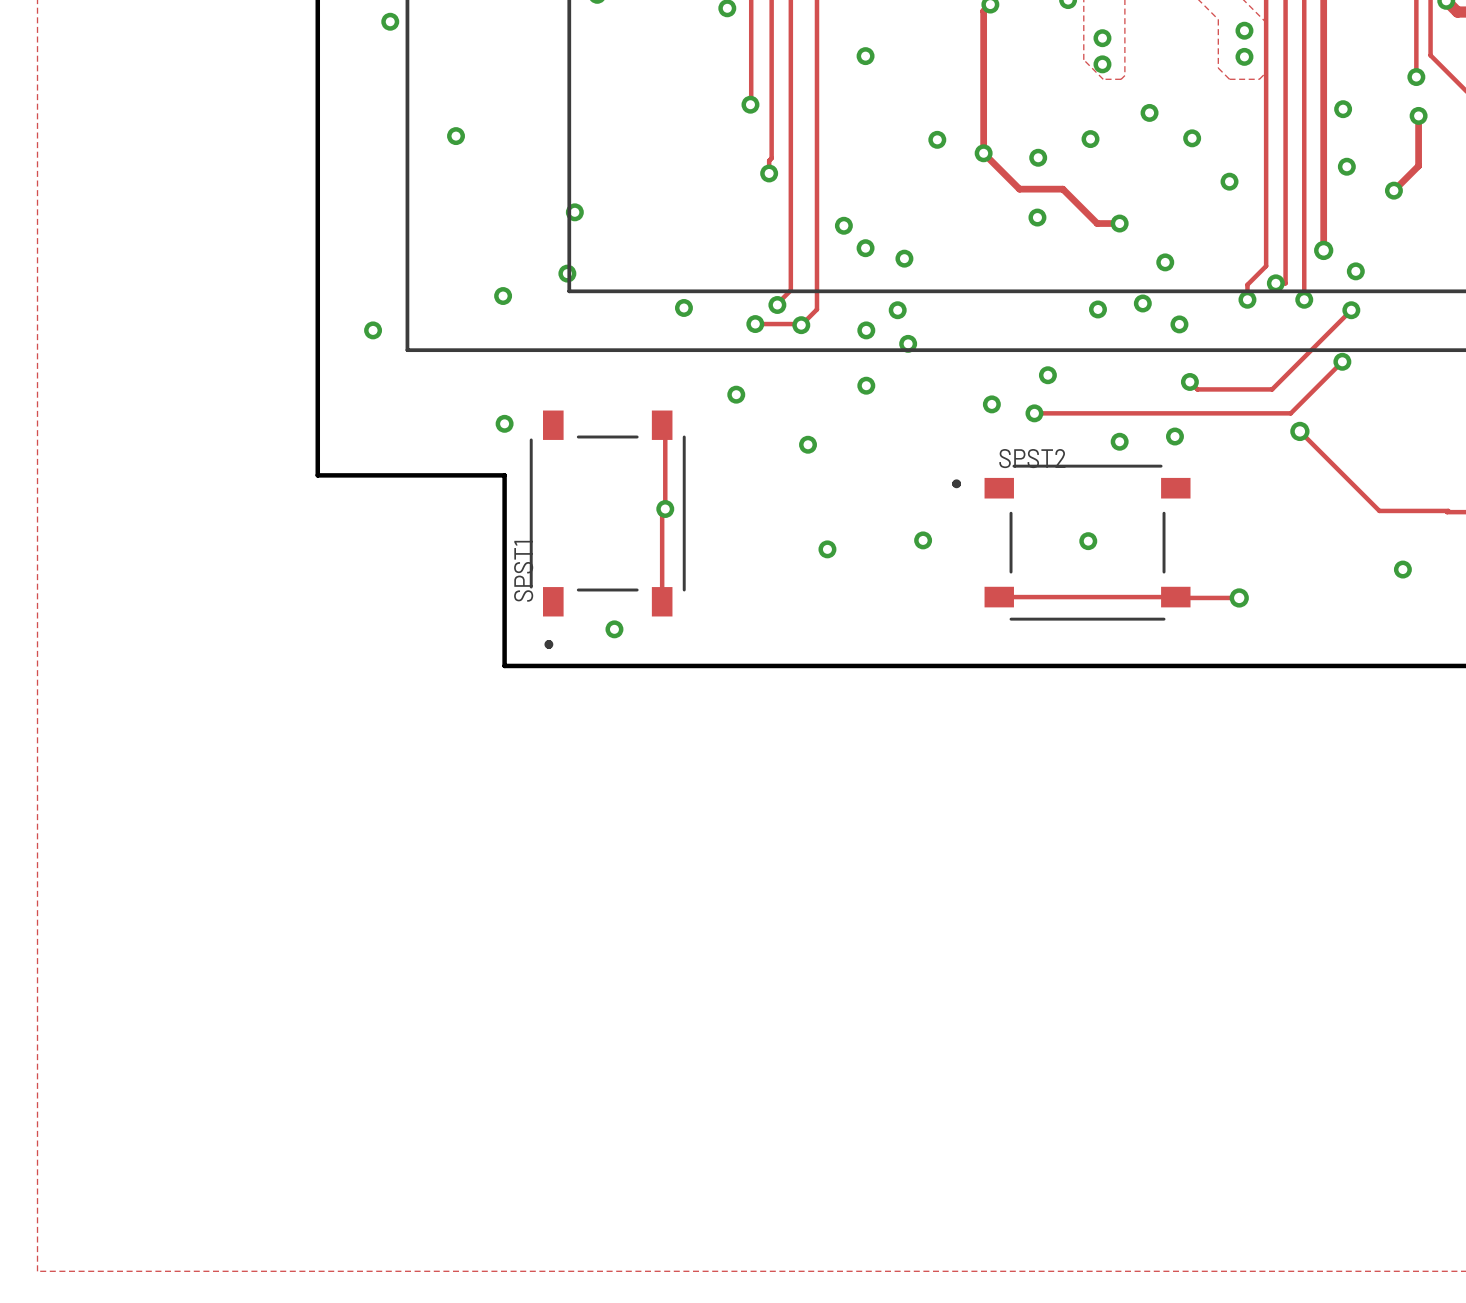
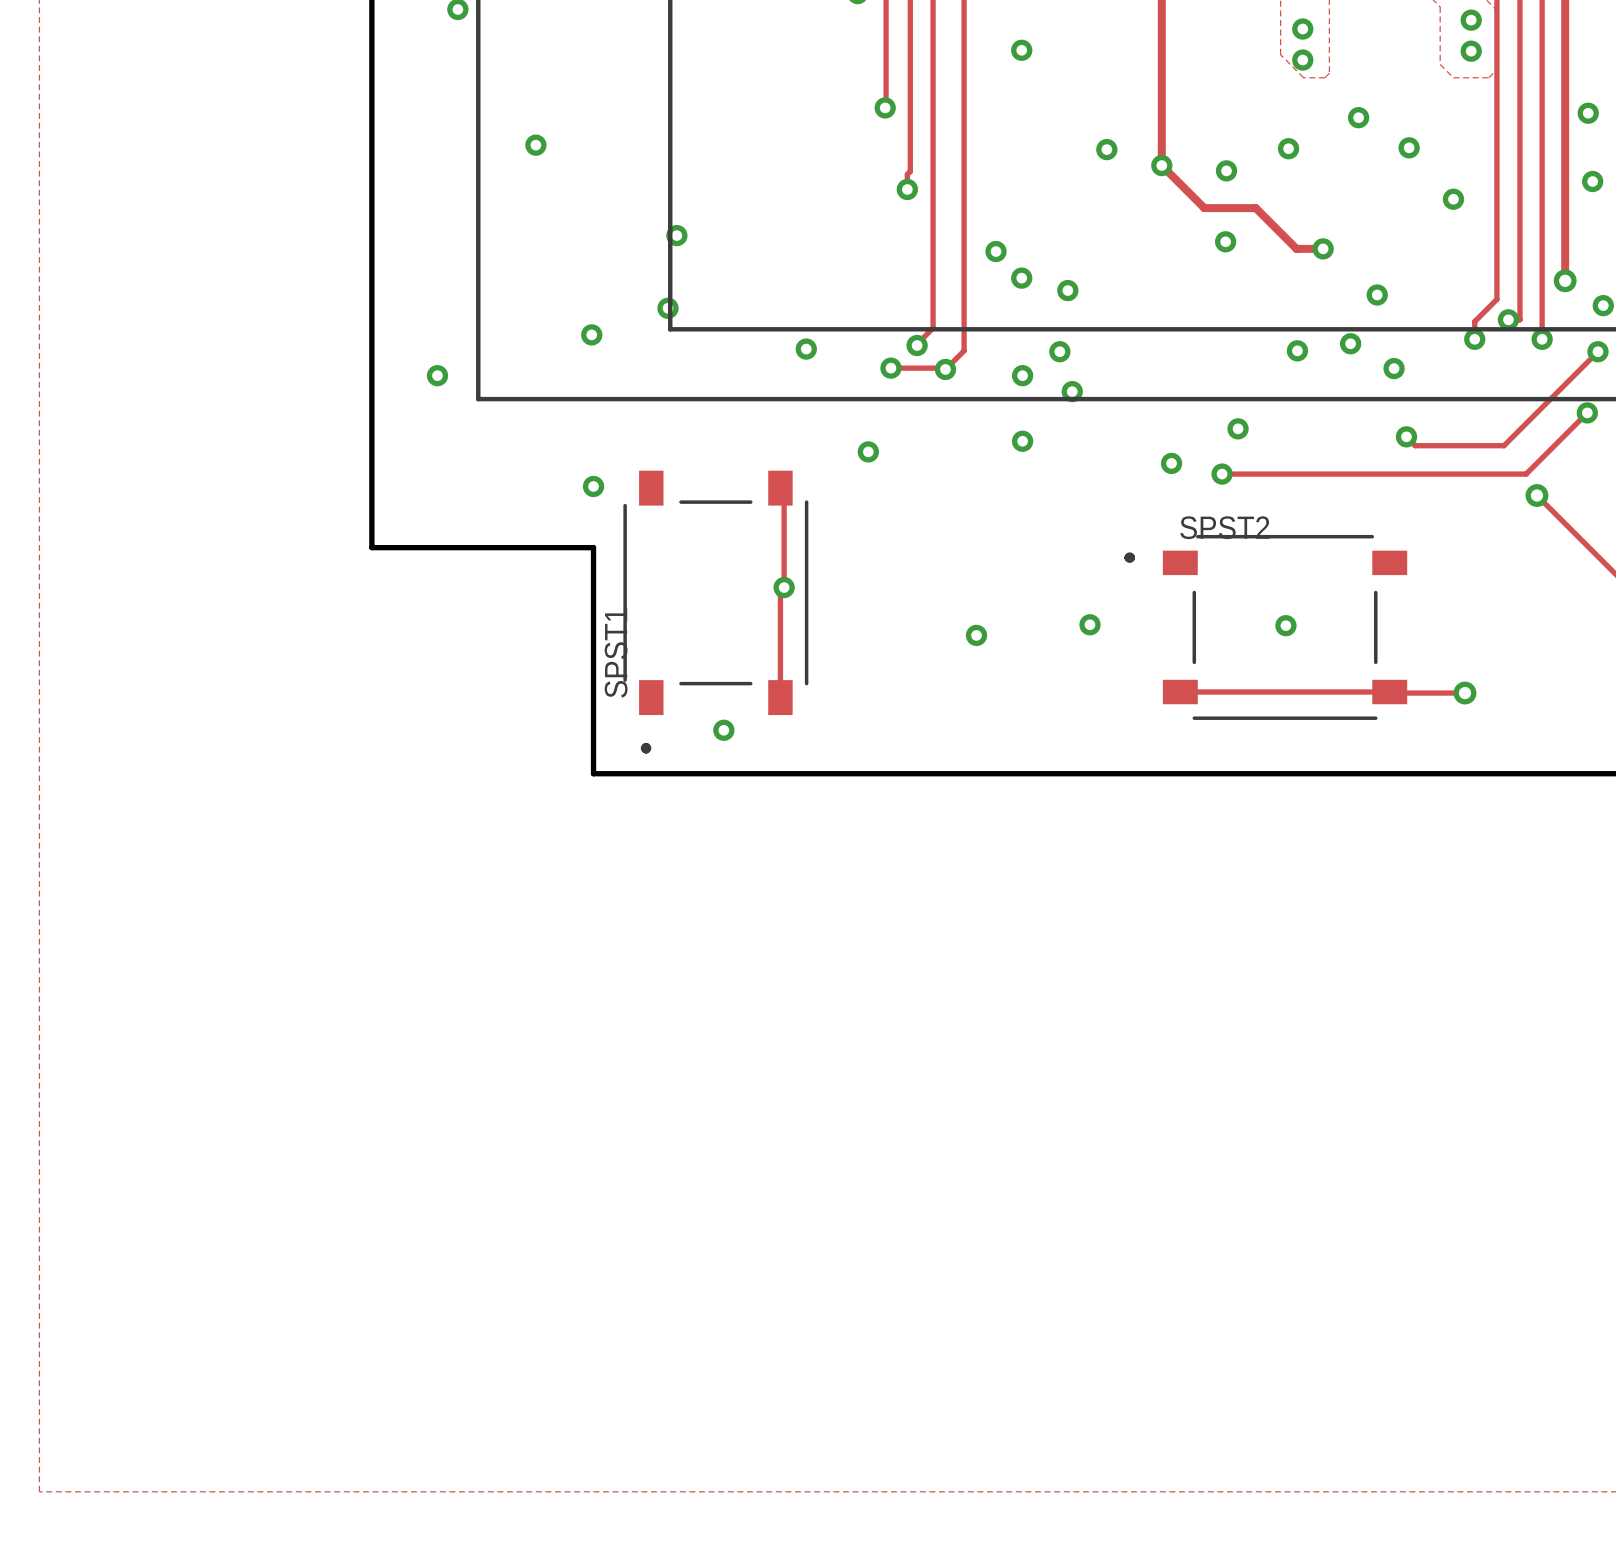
via: (1174, 436) -> none
via: (1119, 441) -> none
via: (808, 444) -> none

